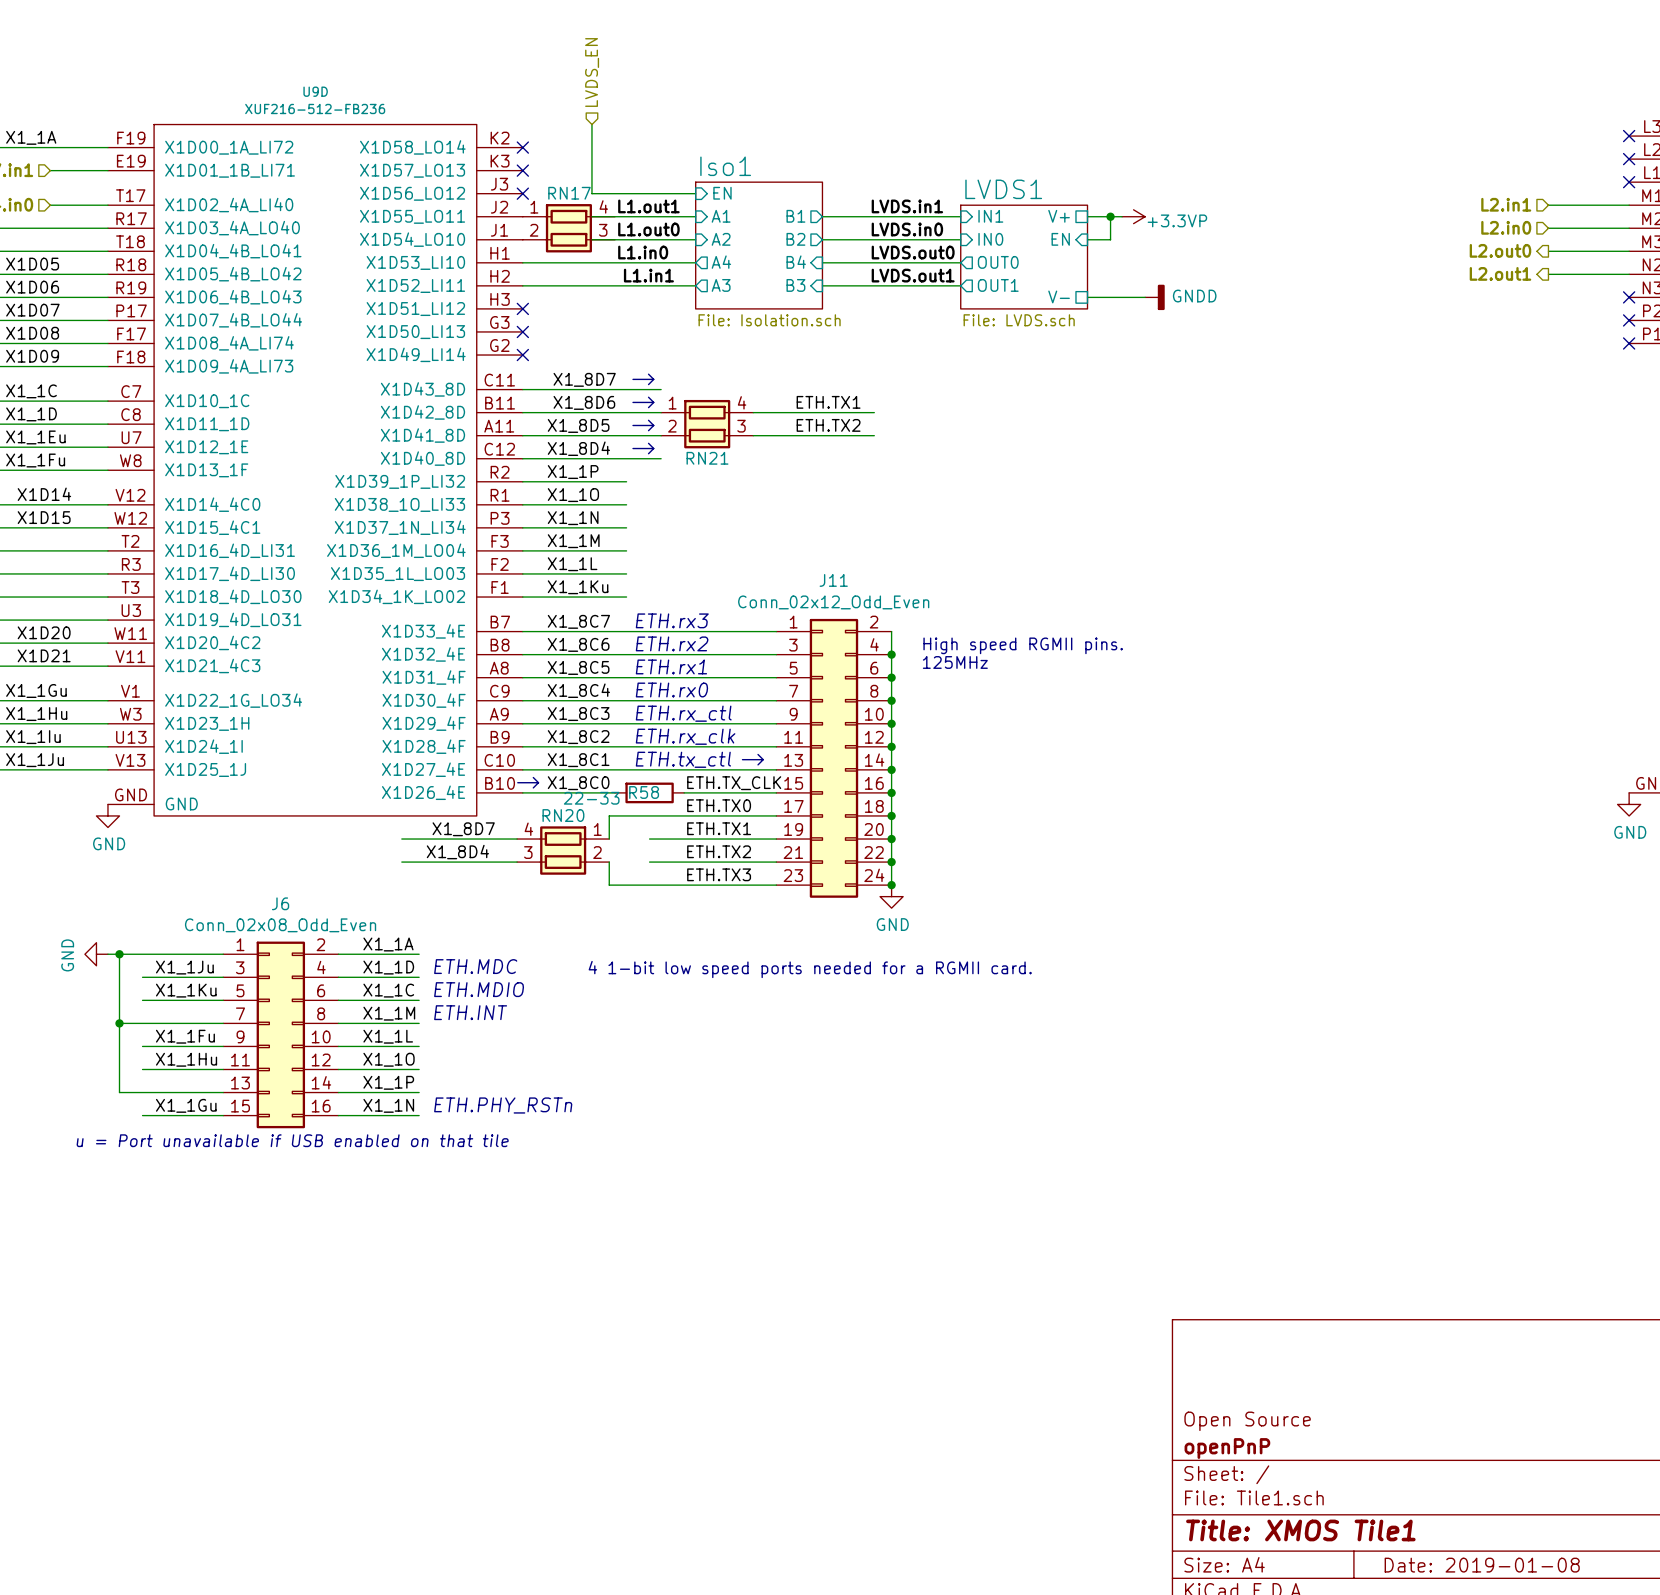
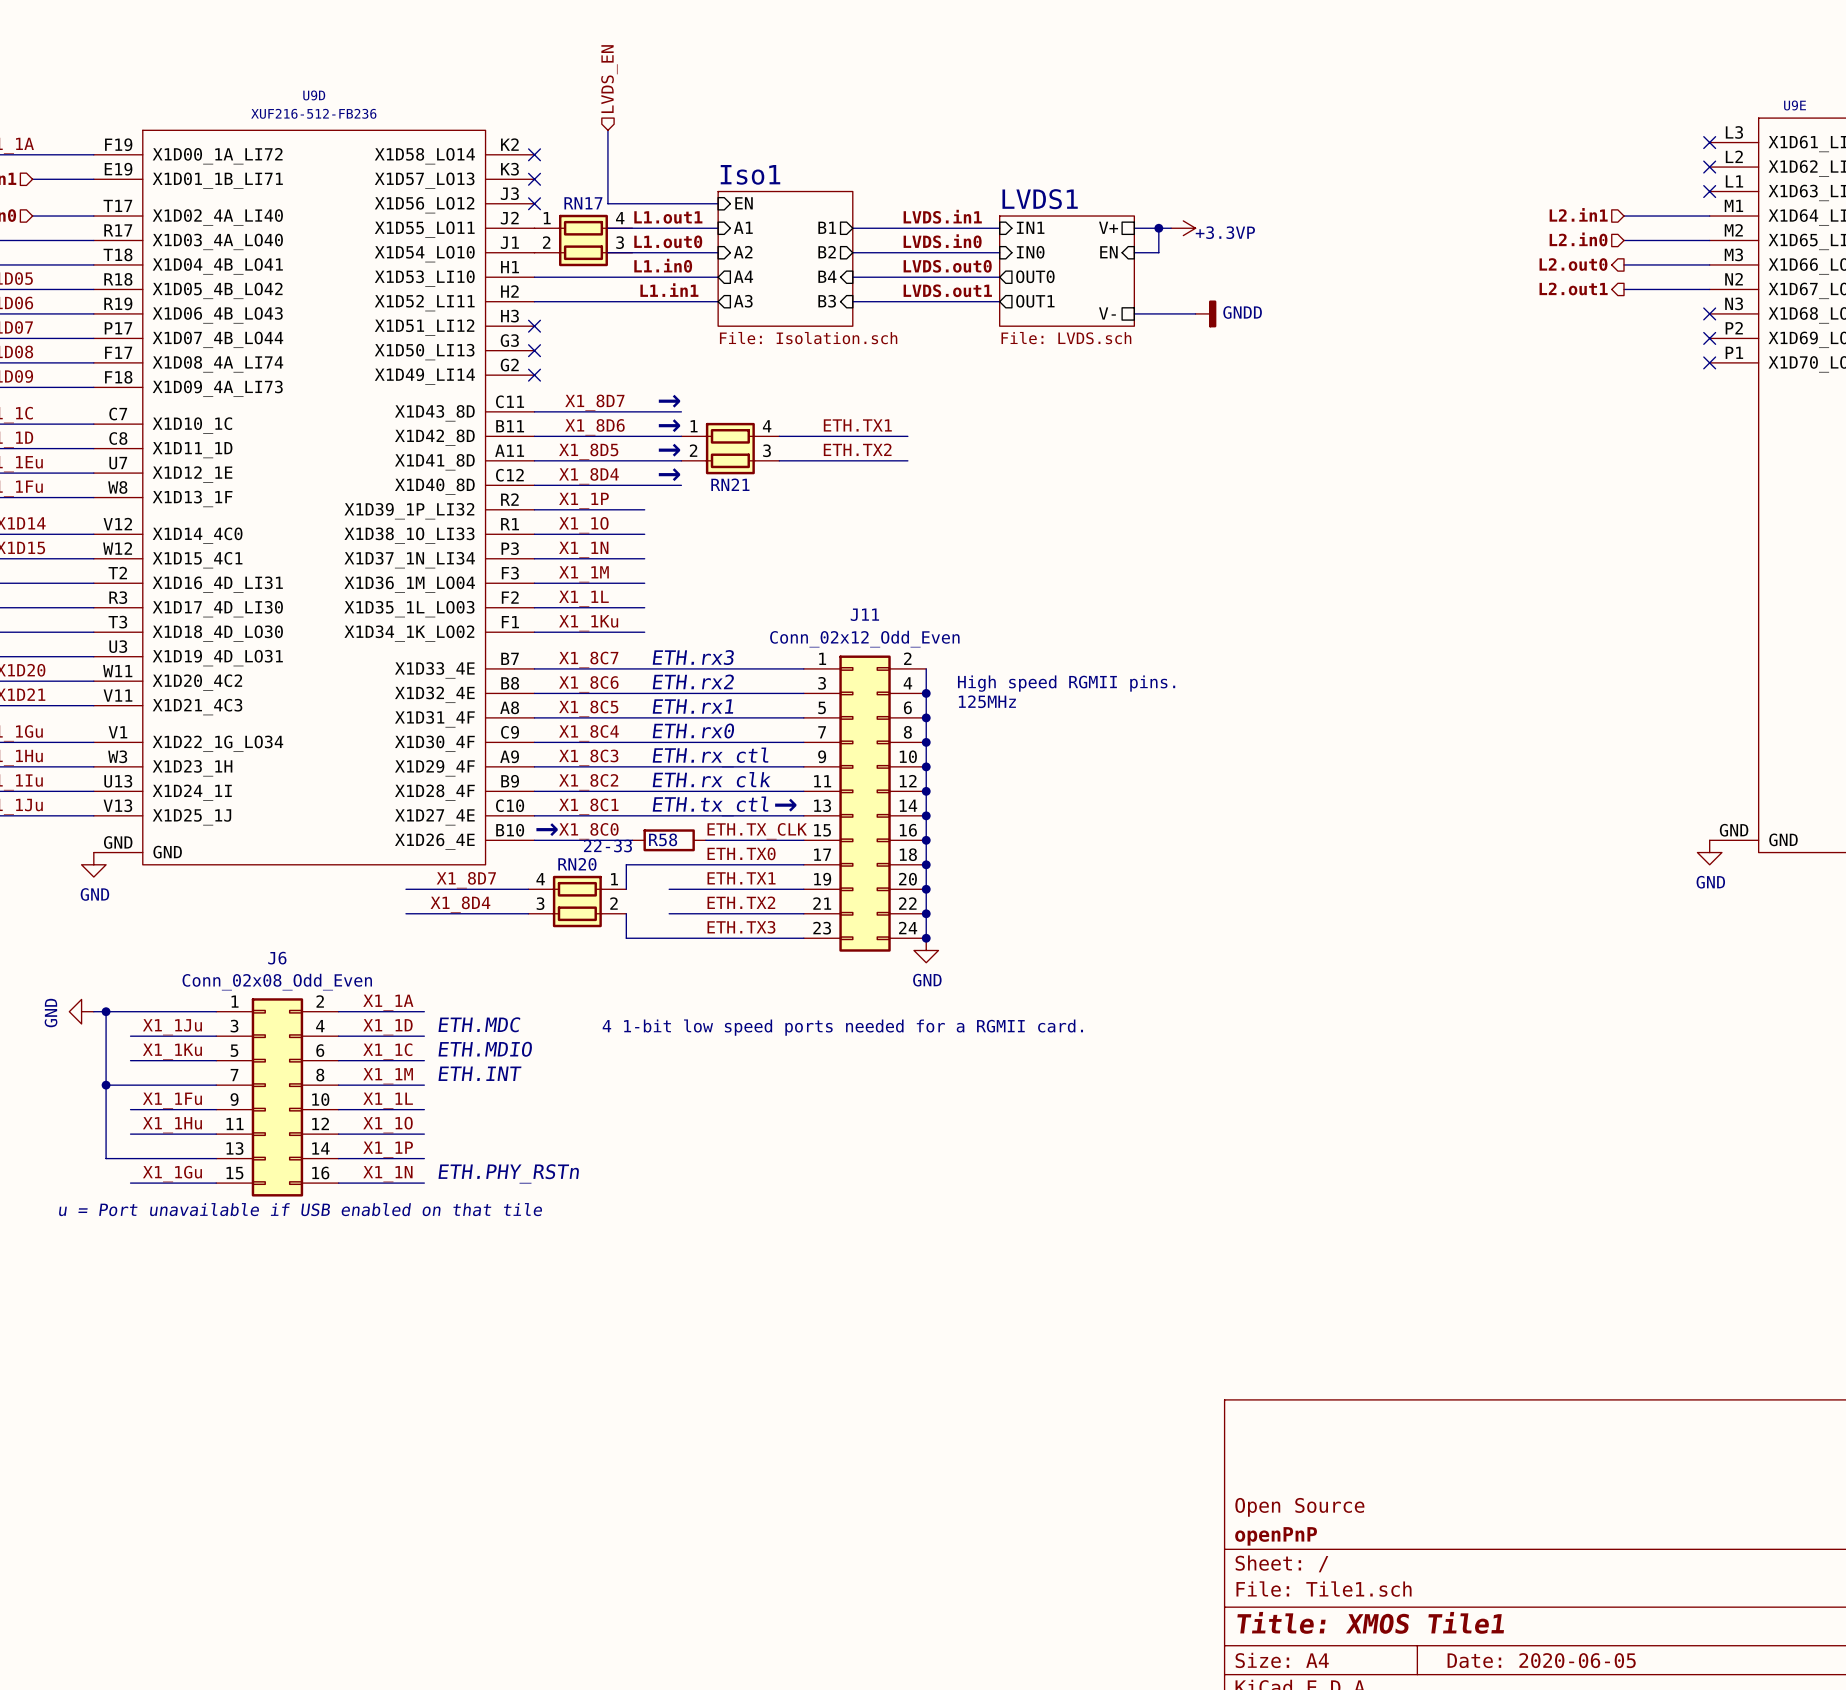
title block: Date: 2019-01-08 (1482, 1565) -> Date: 2020-06-05 (1541, 1660)

